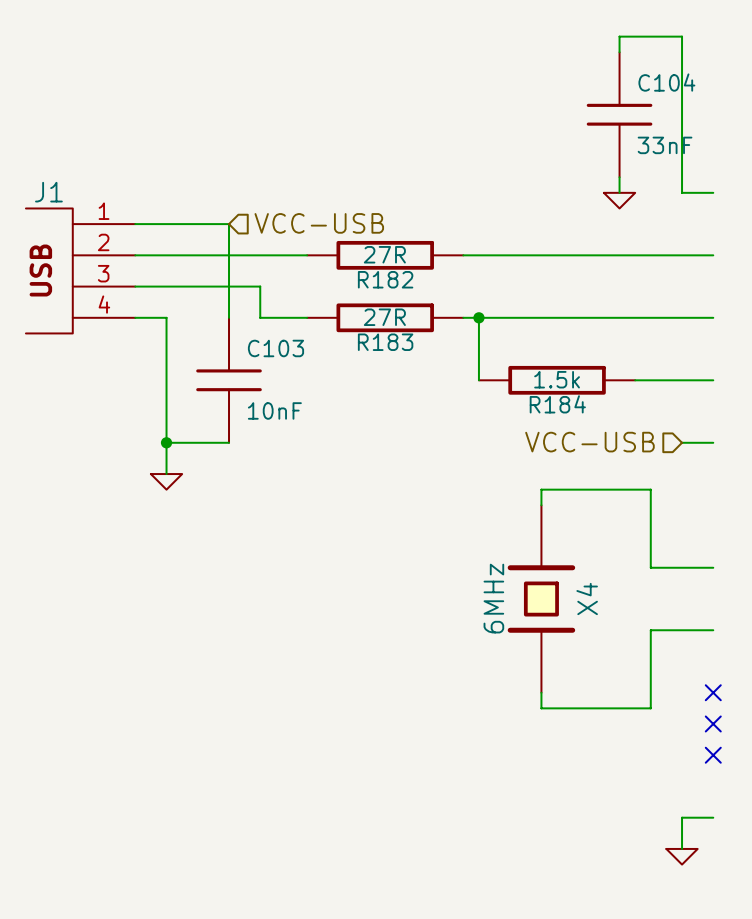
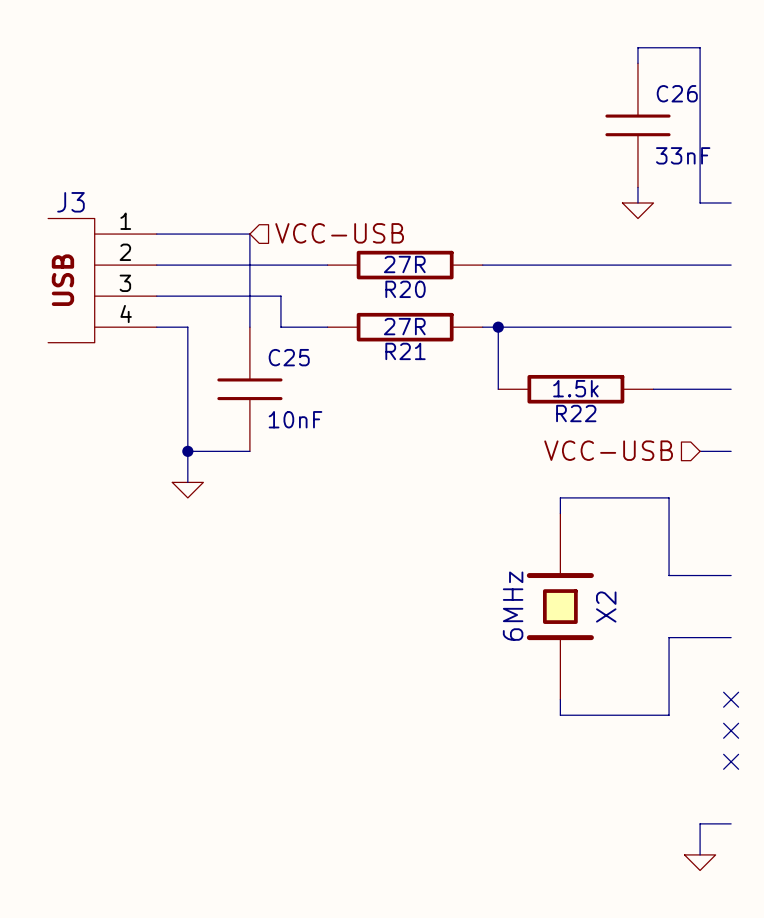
C104 name: C104 (666, 82) -> C26 (677, 93)
J1 name: J1 (48, 192) -> J3 (70, 202)
R182 name: R182 (385, 279) -> R20 (405, 289)
R183 name: R183 (385, 342) -> R21 (405, 351)
C103 name: C103 (275, 348) -> C25 (289, 357)
R184 name: R184 (557, 404) -> R22 (576, 413)
X4 name: X4 (587, 599) -> X2 (606, 607)

